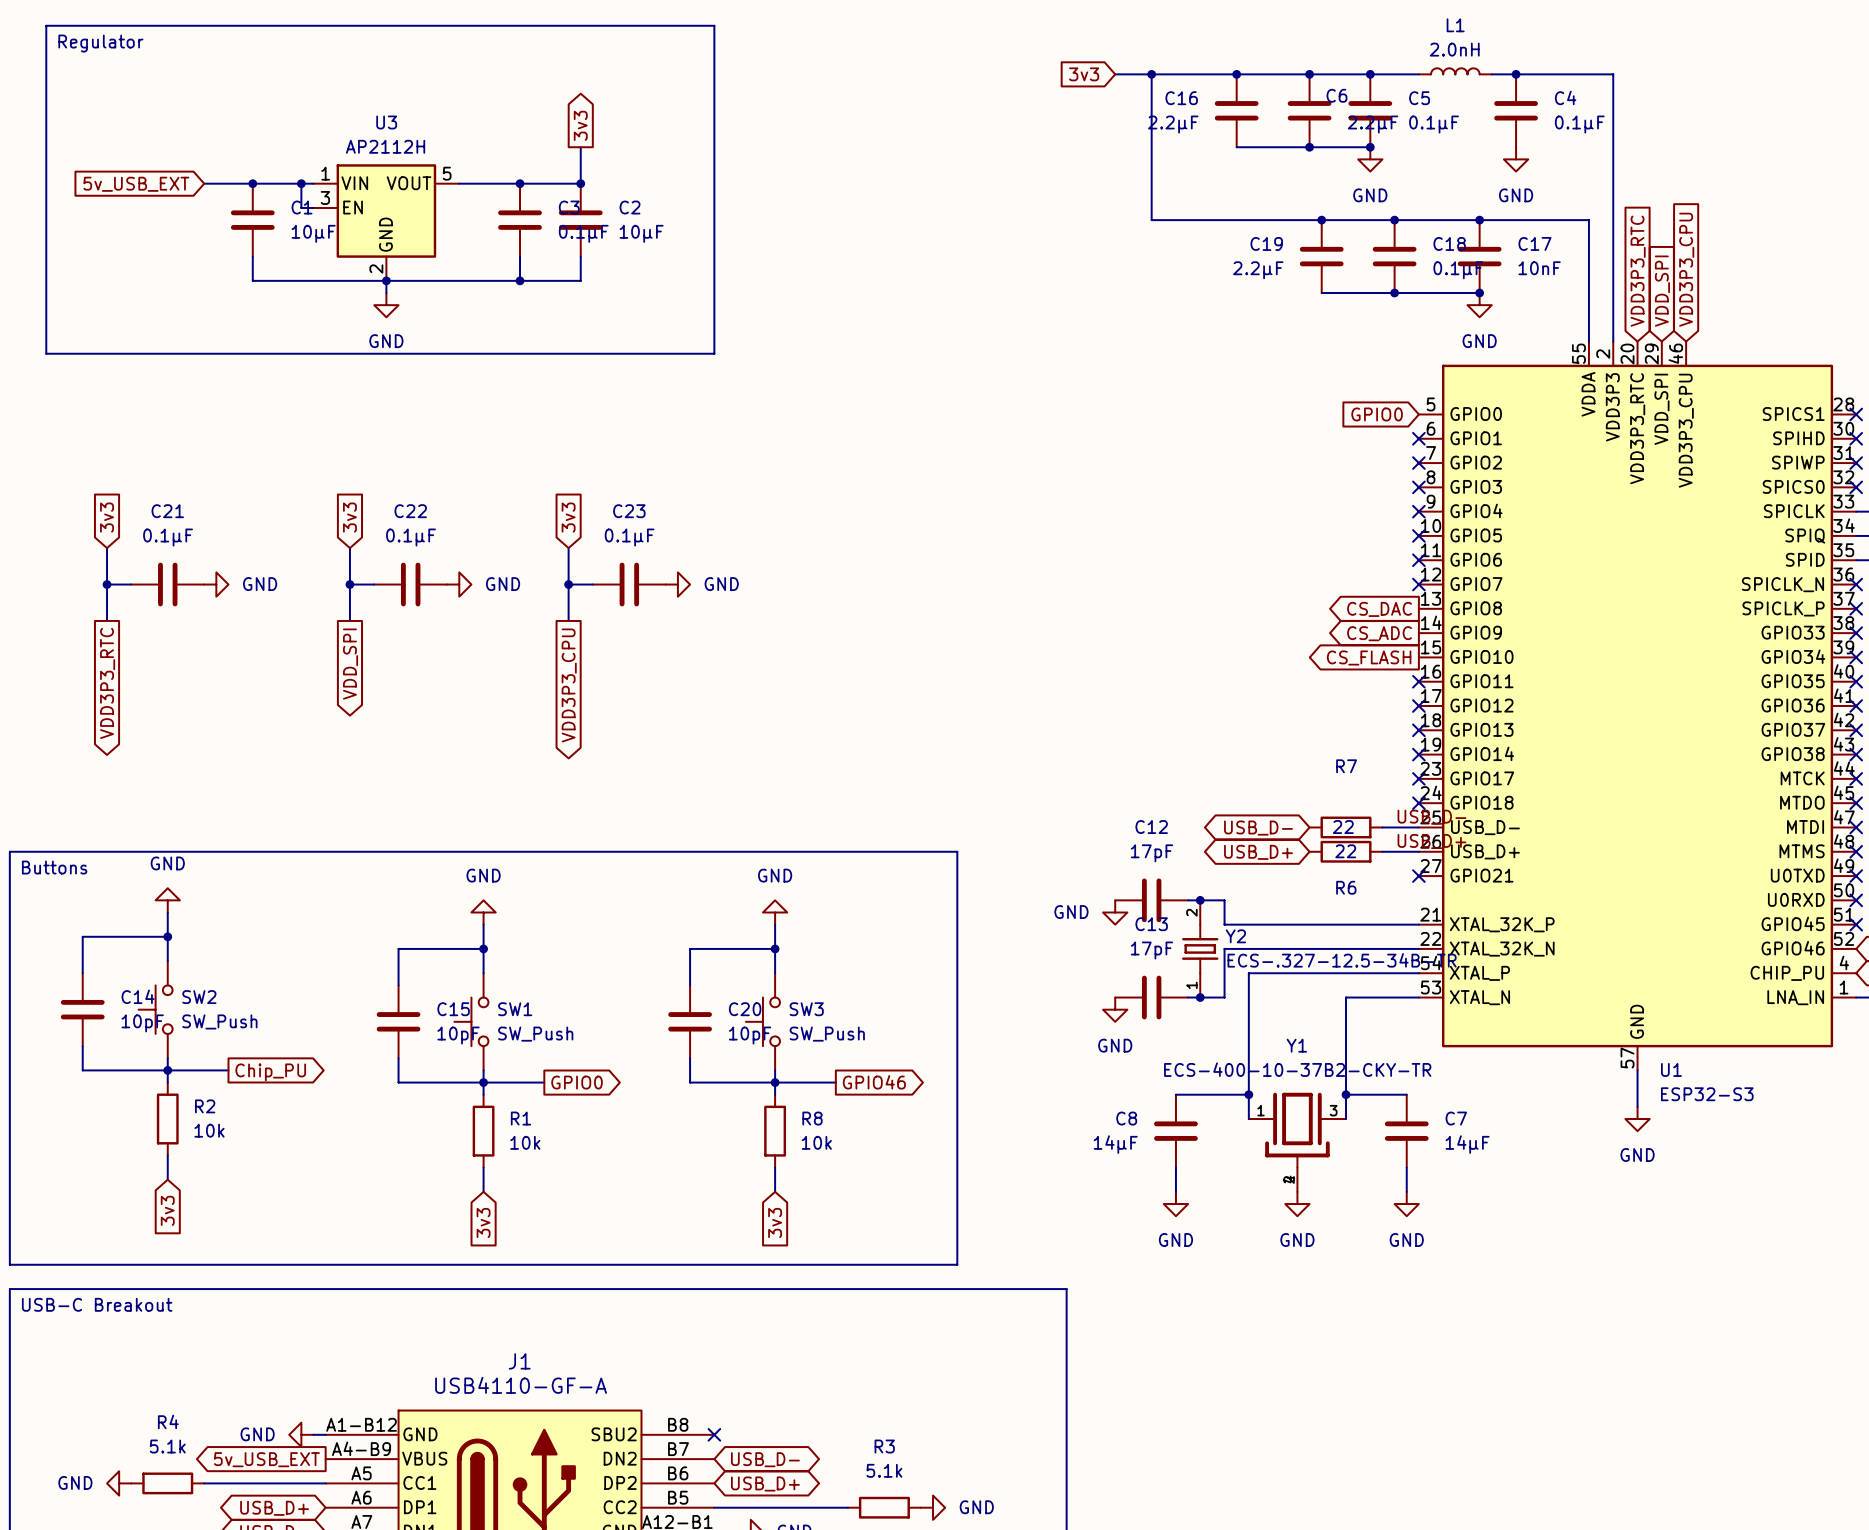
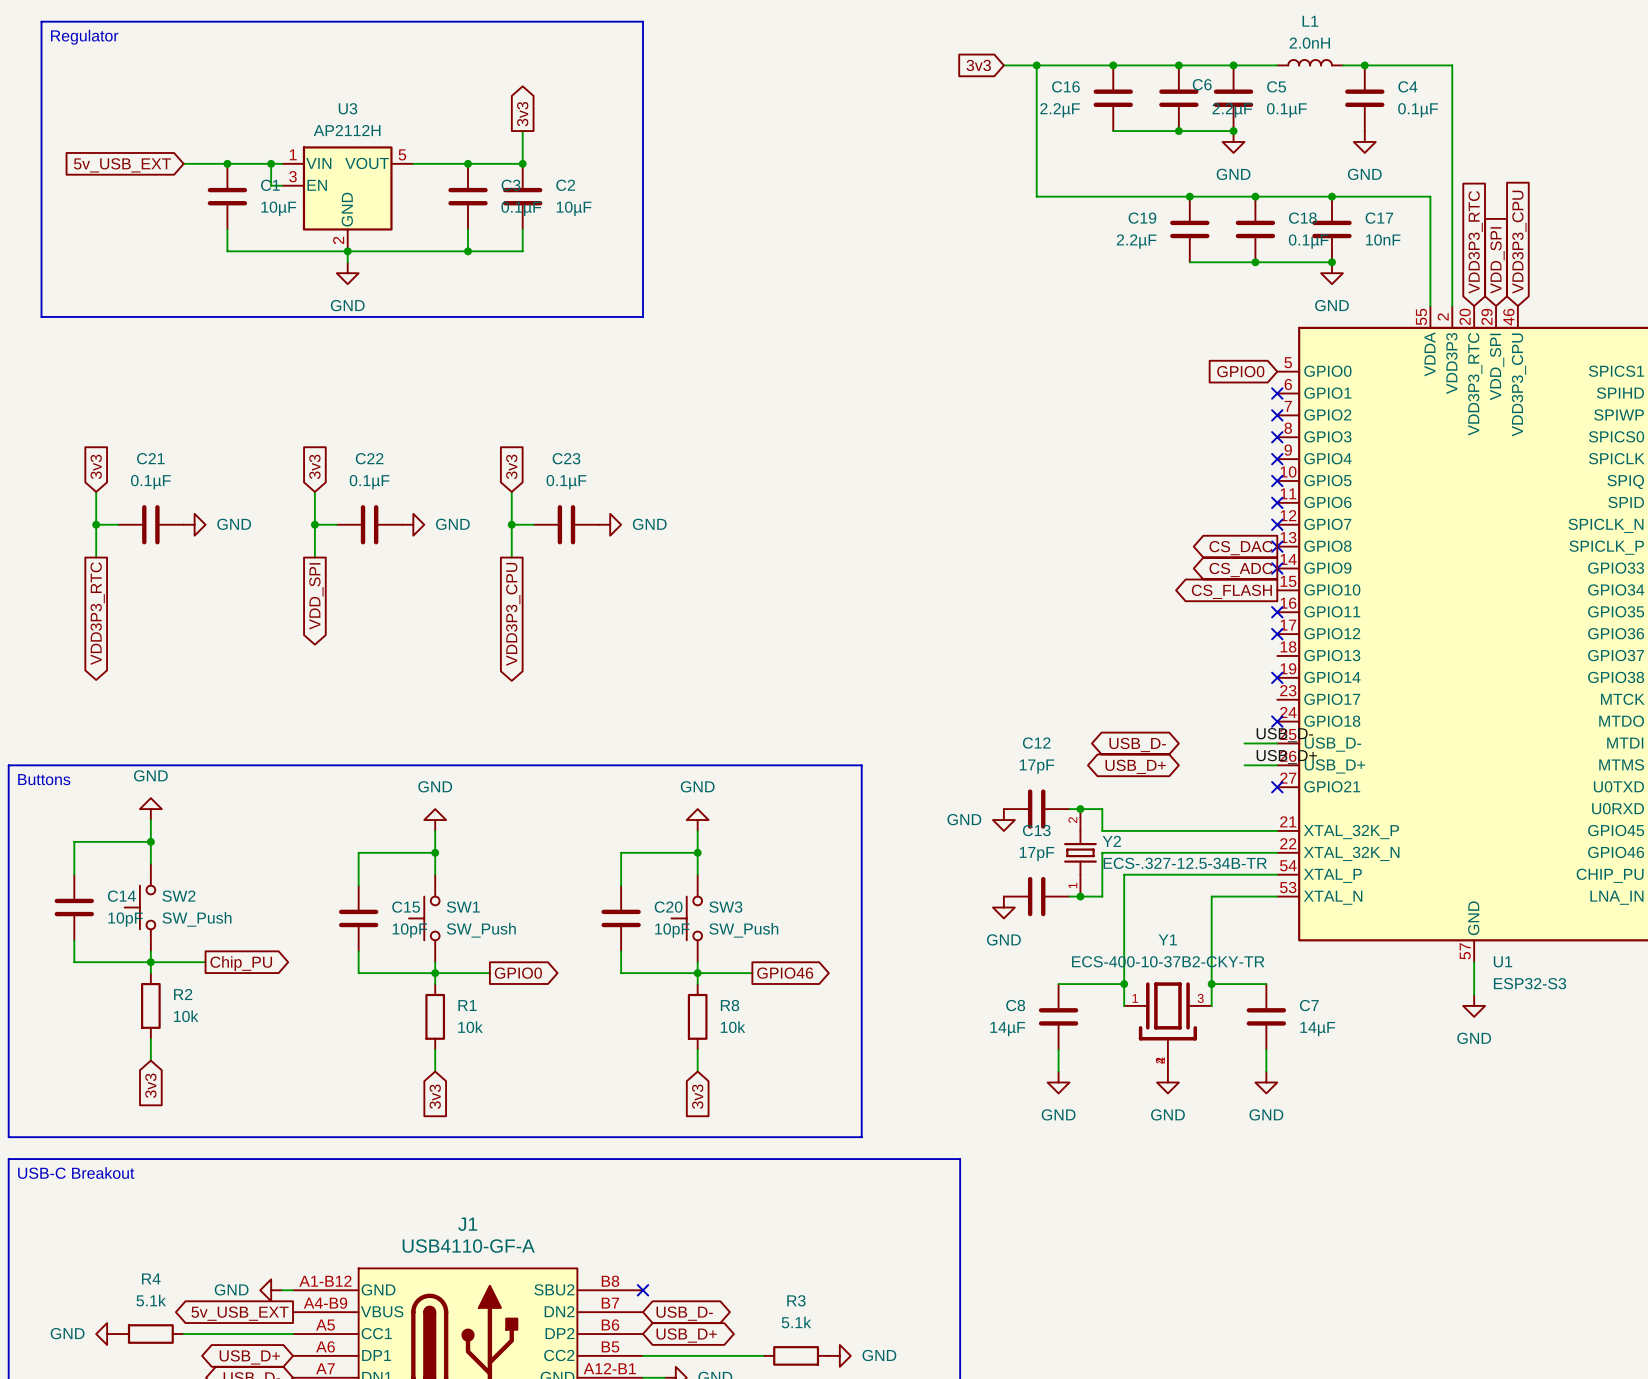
no-connect mark: none -> (1277, 546)
no-connect mark: none -> (1277, 568)
no-connect mark: (1418, 730) -> none
no-connect mark: (1418, 778) -> none
R7: 22 (1346, 827) -> none
R6: 22 (1346, 851) -> none

